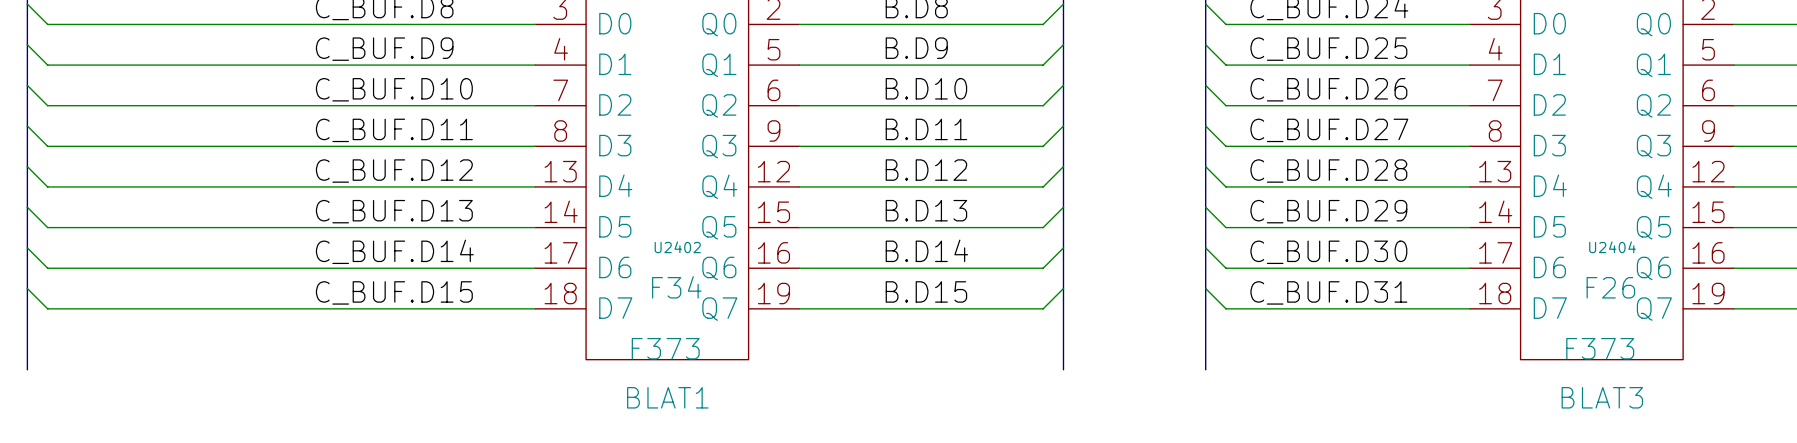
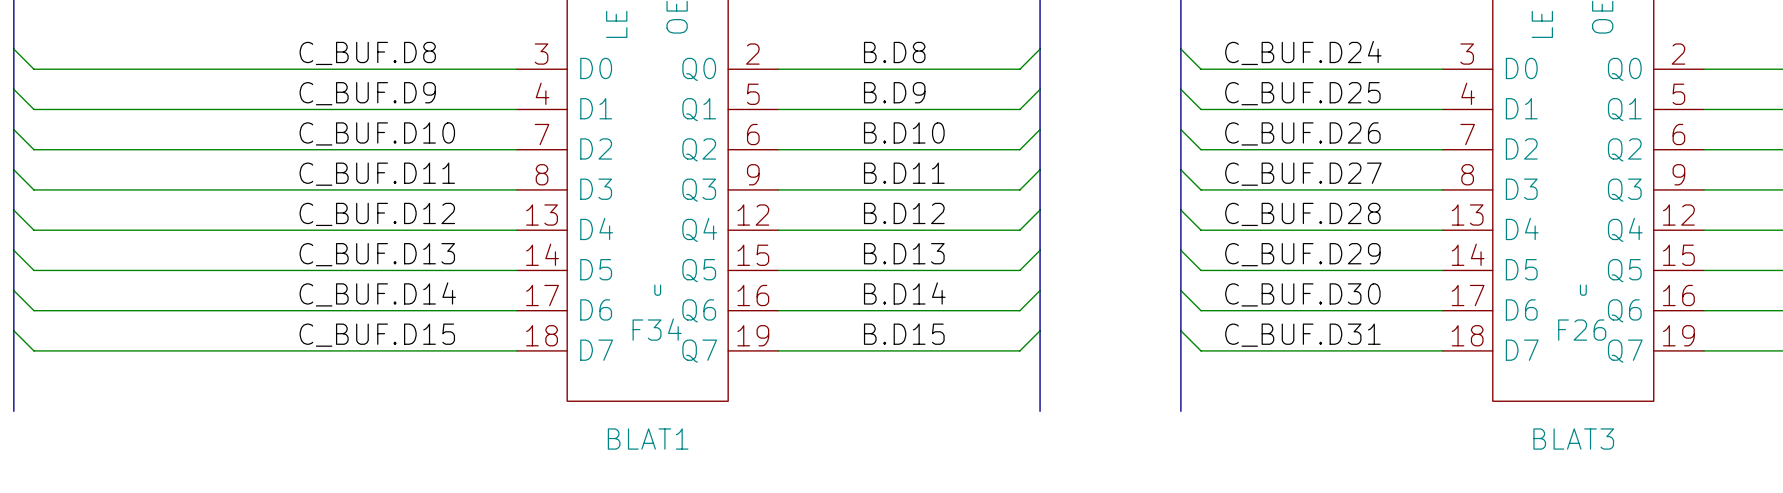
U2402 name: U2402 (677, 247) -> U (657, 290)
U2404 name: U2404 (1612, 247) -> U (1583, 290)
U2402 value: F373 (665, 348) -> none
U2404 value: F373 (1600, 348) -> none

